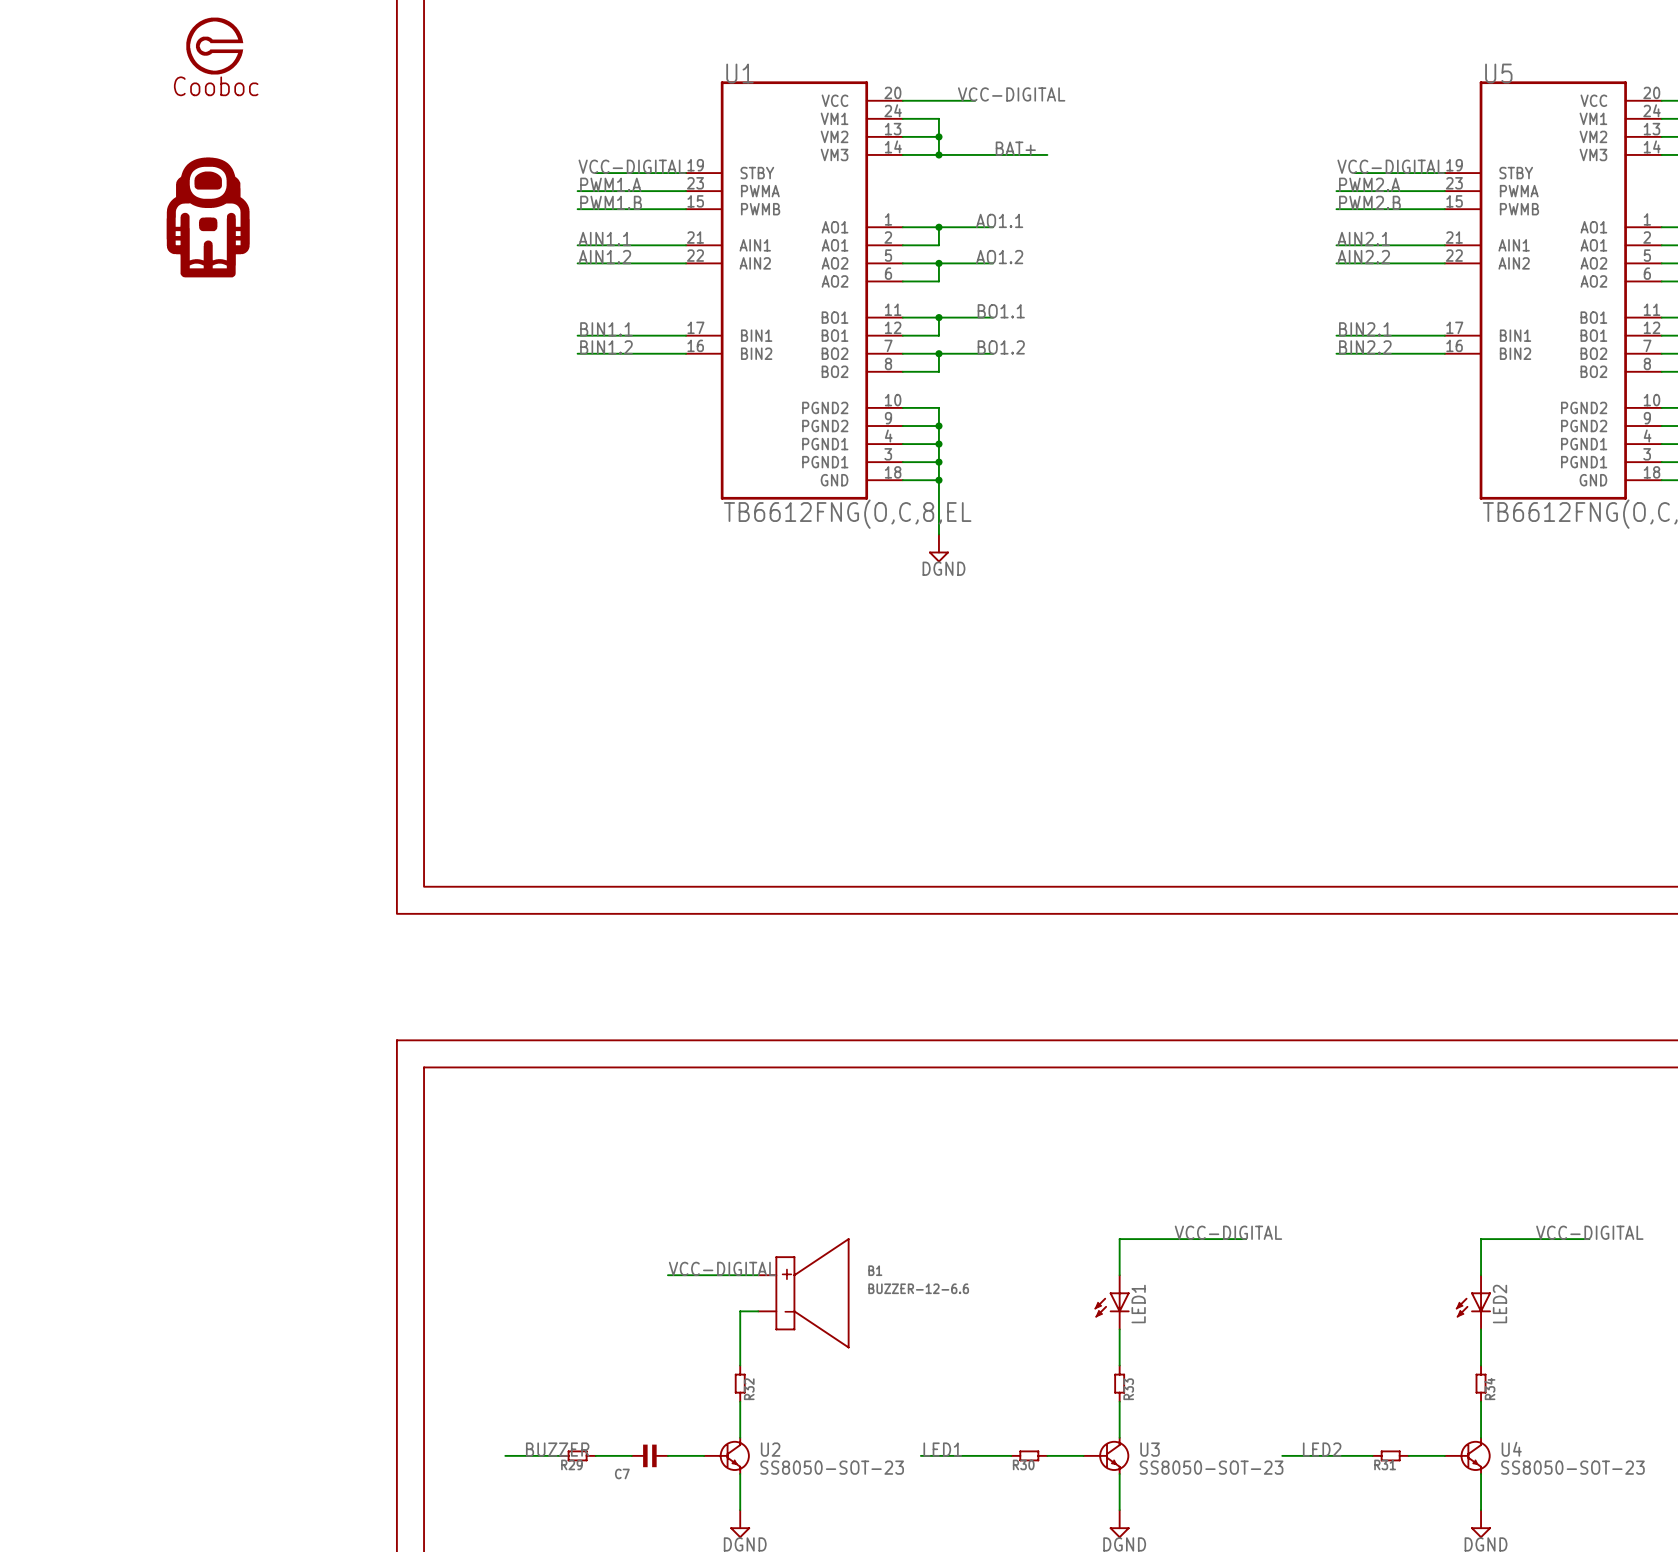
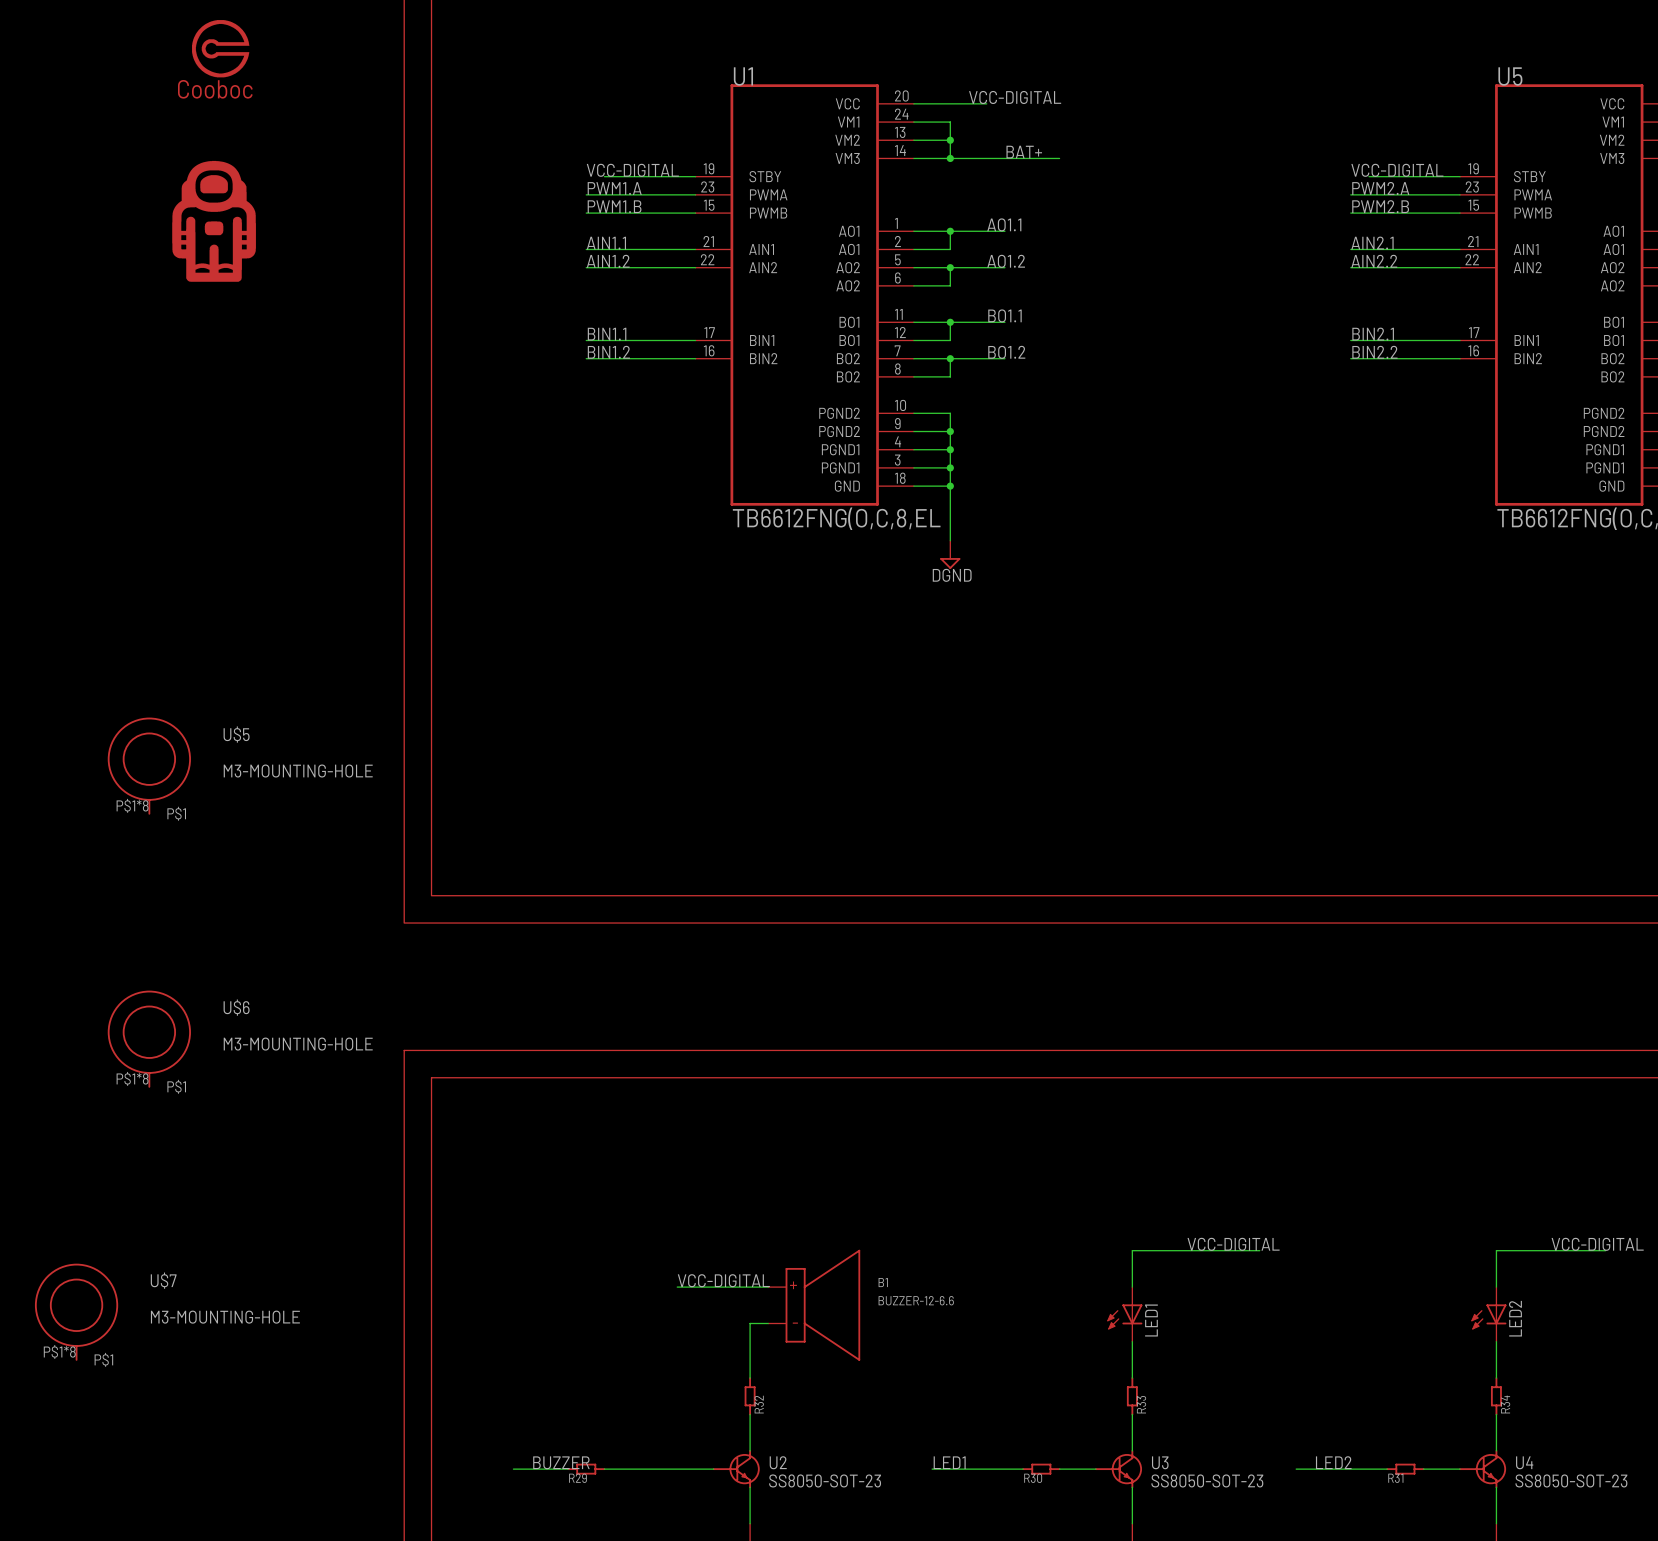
U$5: none -> M3-MOUNTING-HOLE (149, 766)
U$6: none -> M3-MOUNTING-HOLE (149, 1039)
U$7: none -> M3-MOUNTING-HOLE (76, 1312)
C7: (649, 1455) -> none

